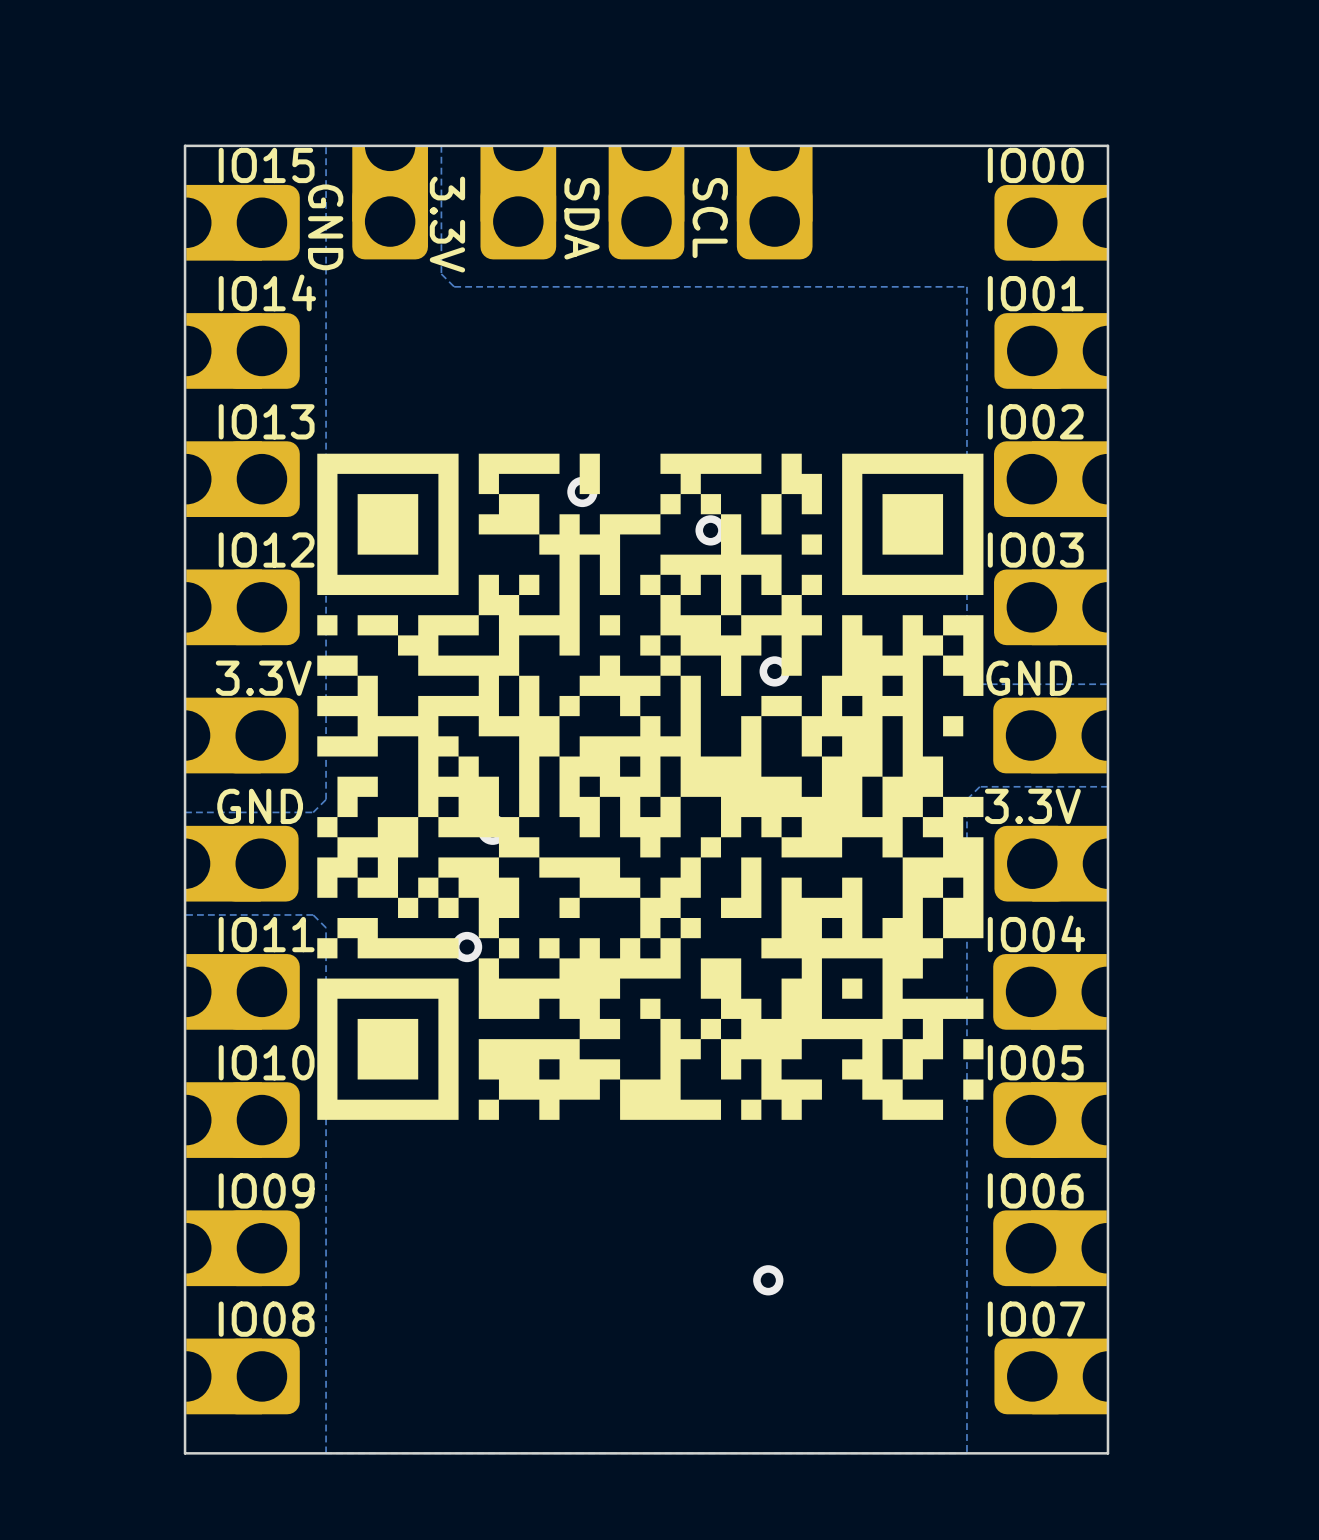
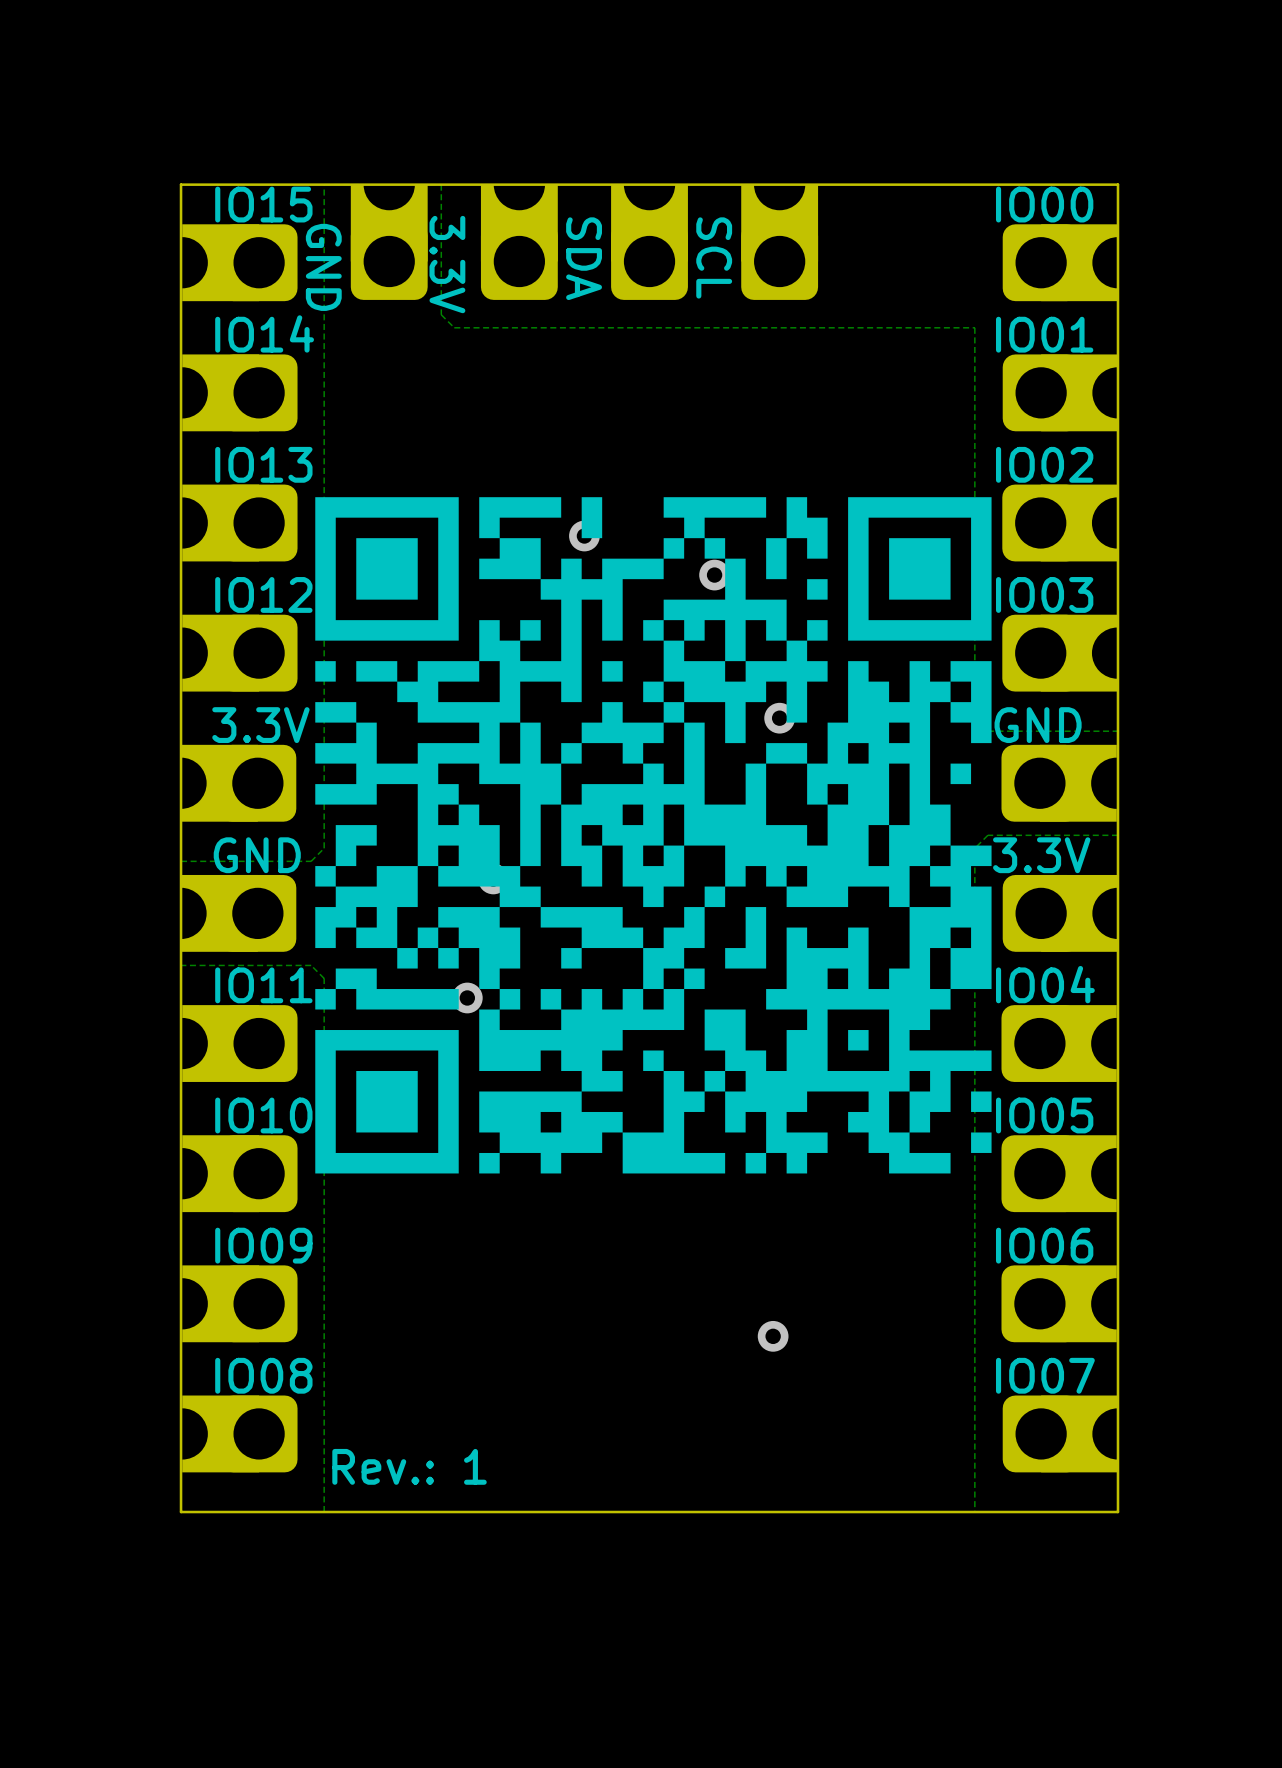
text: none -> Rev.: 1 (409, 1466)

